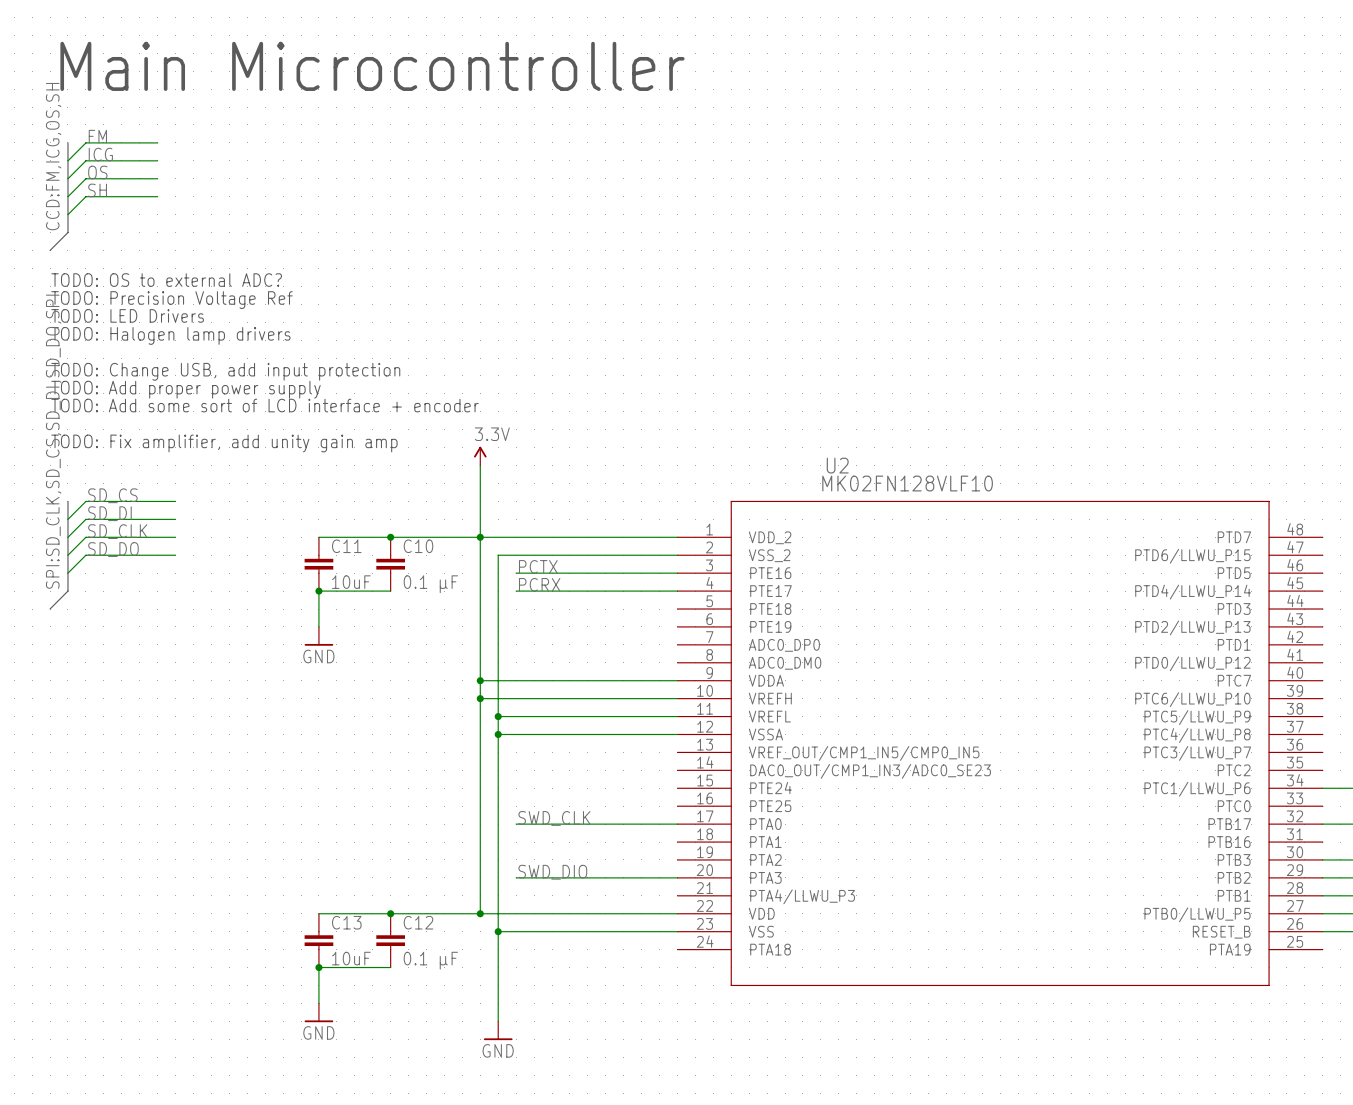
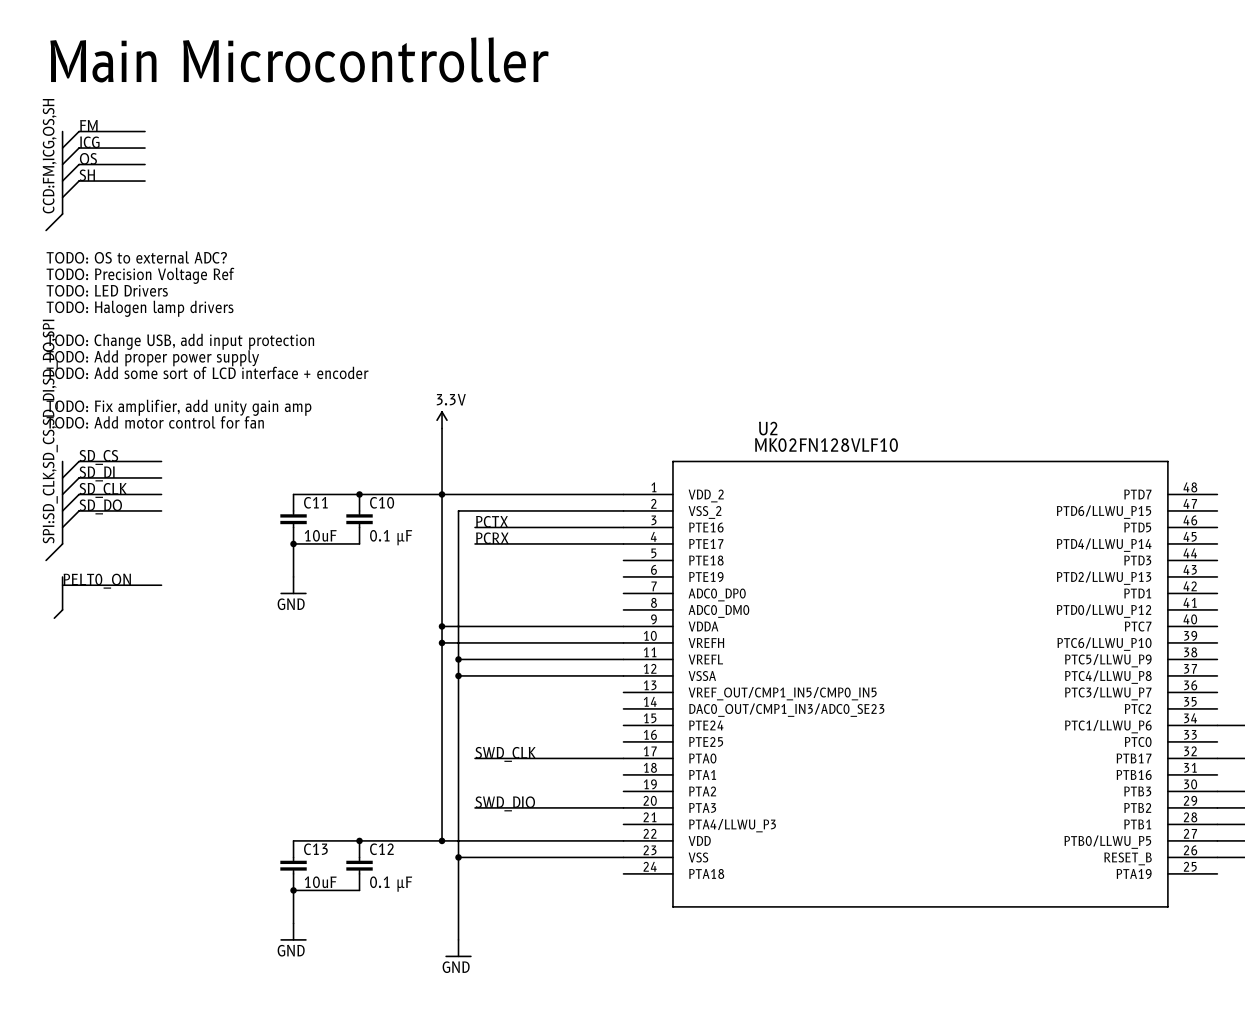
text: none -> TODO: Add motor control for fan (155, 422)
bus: none -> (62, 576) (62, 609) (54, 618)
label: none -> PELT0_ON (97, 581)
wire: none -> (62, 585) (161, 585)

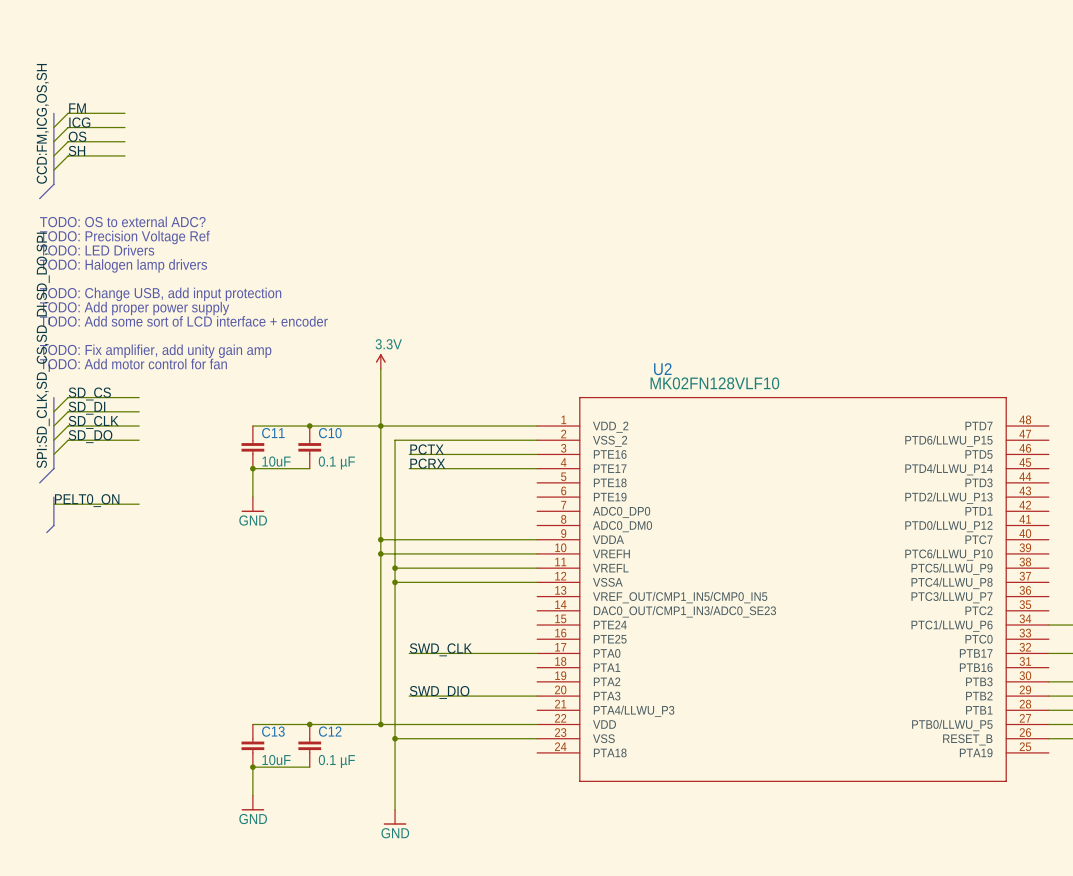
text: Main Microcontroller (299, 59) -> none

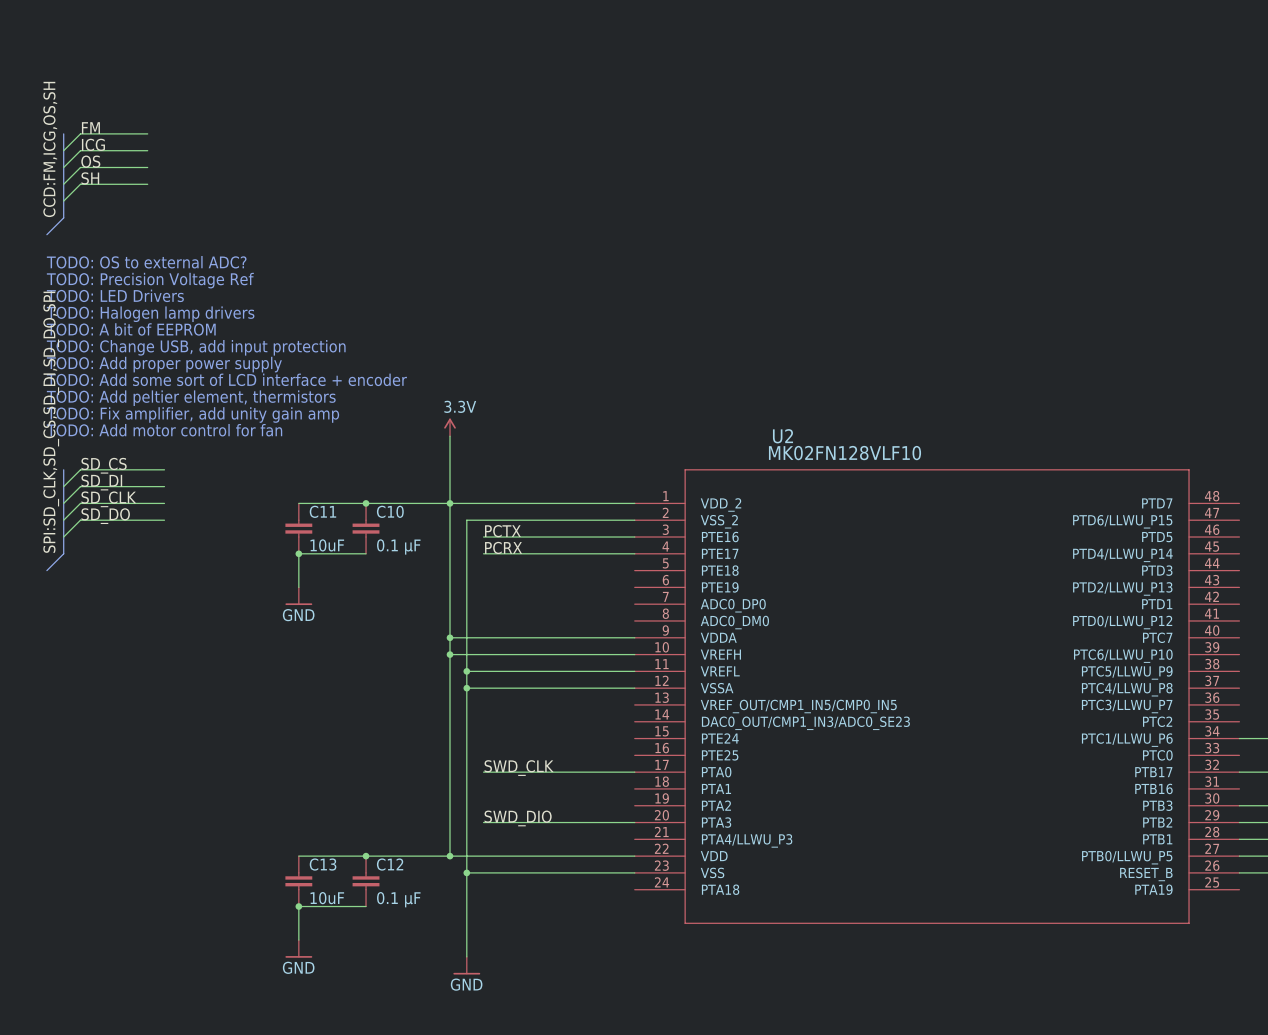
text: none -> TODO: A bit of EEPROM (131, 329)
text: none -> TODO: Add peltier element, thermistors (191, 398)
bus: (53, 497) (53, 525) (46, 532) -> none
label: PELT0_ON (87, 500) -> none
wire: (53, 504) (139, 504) -> none

